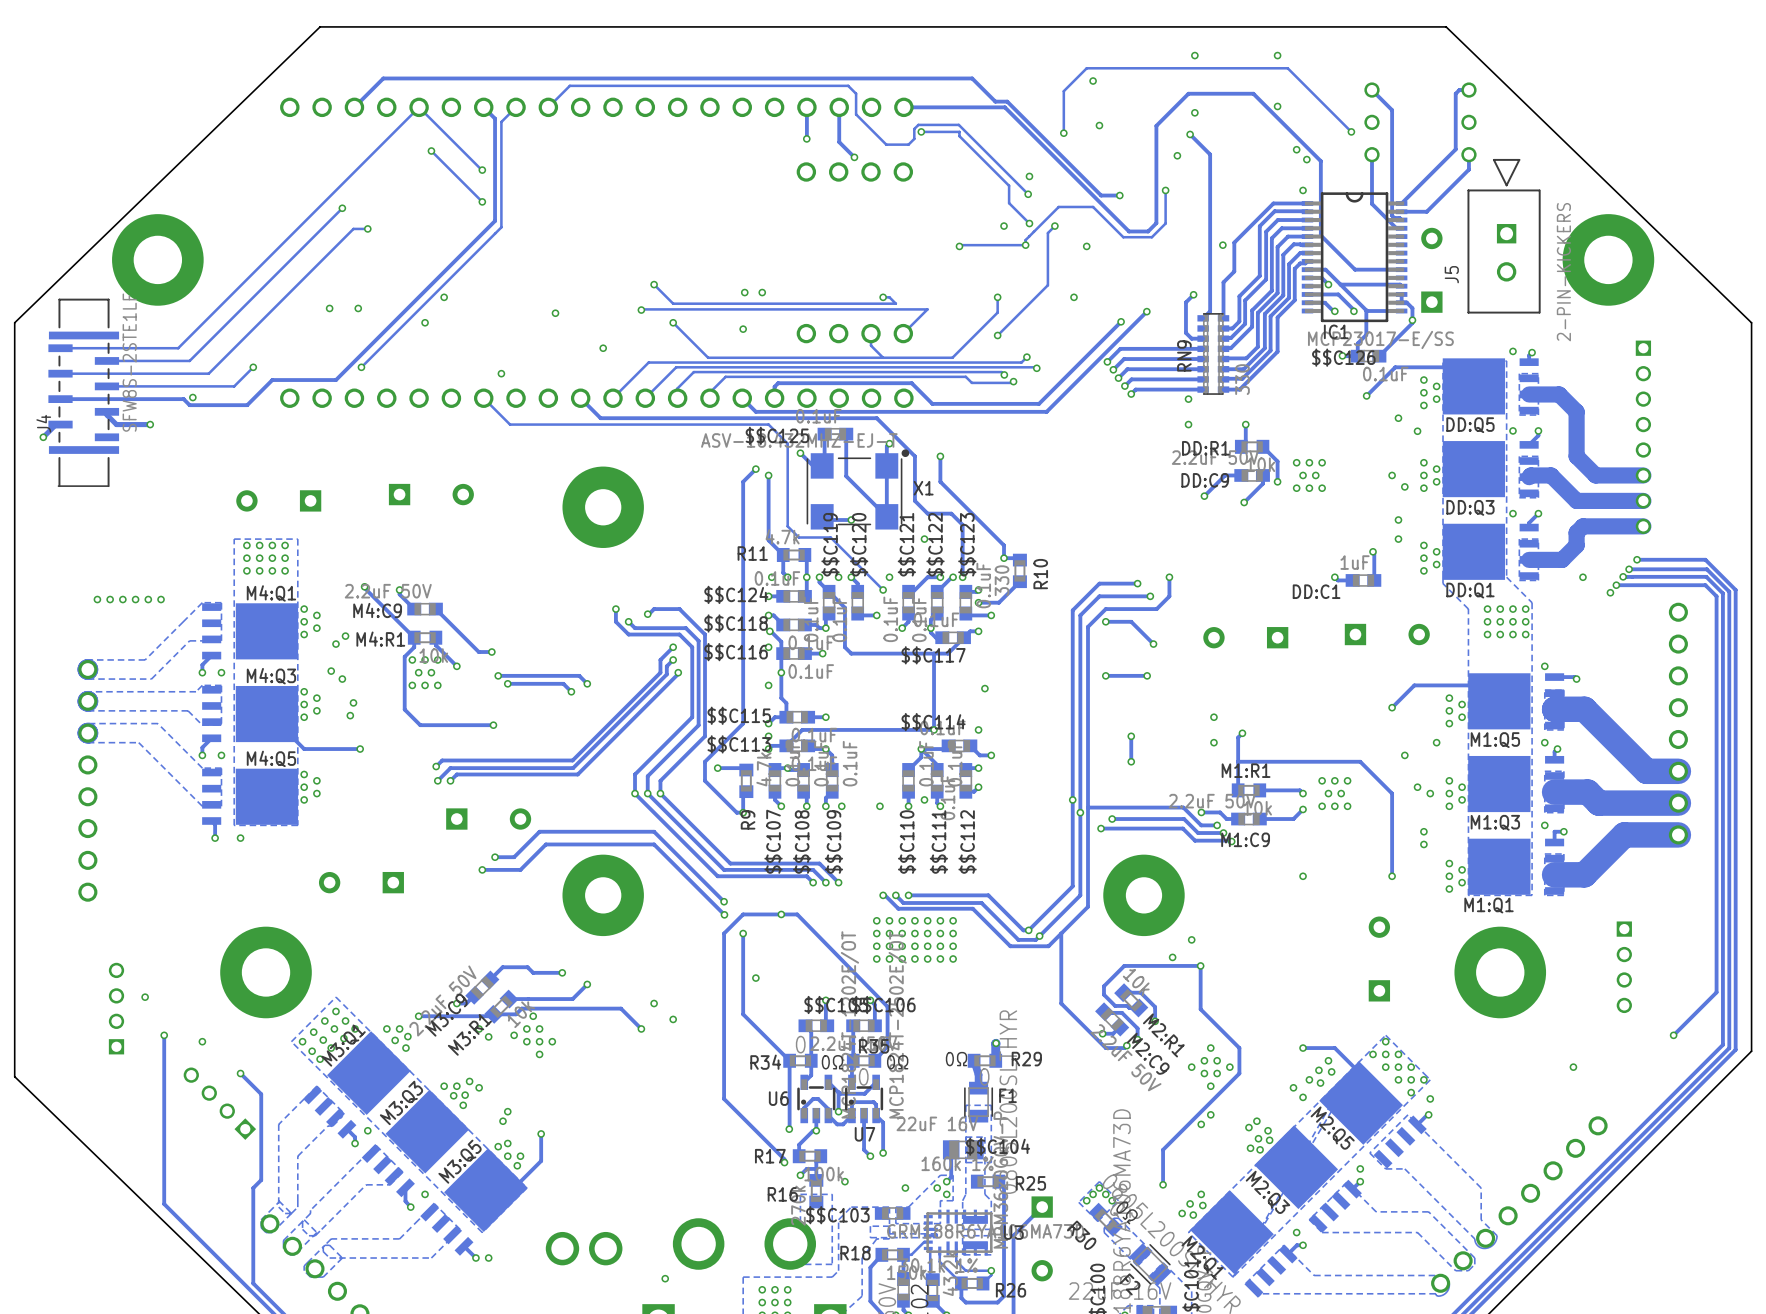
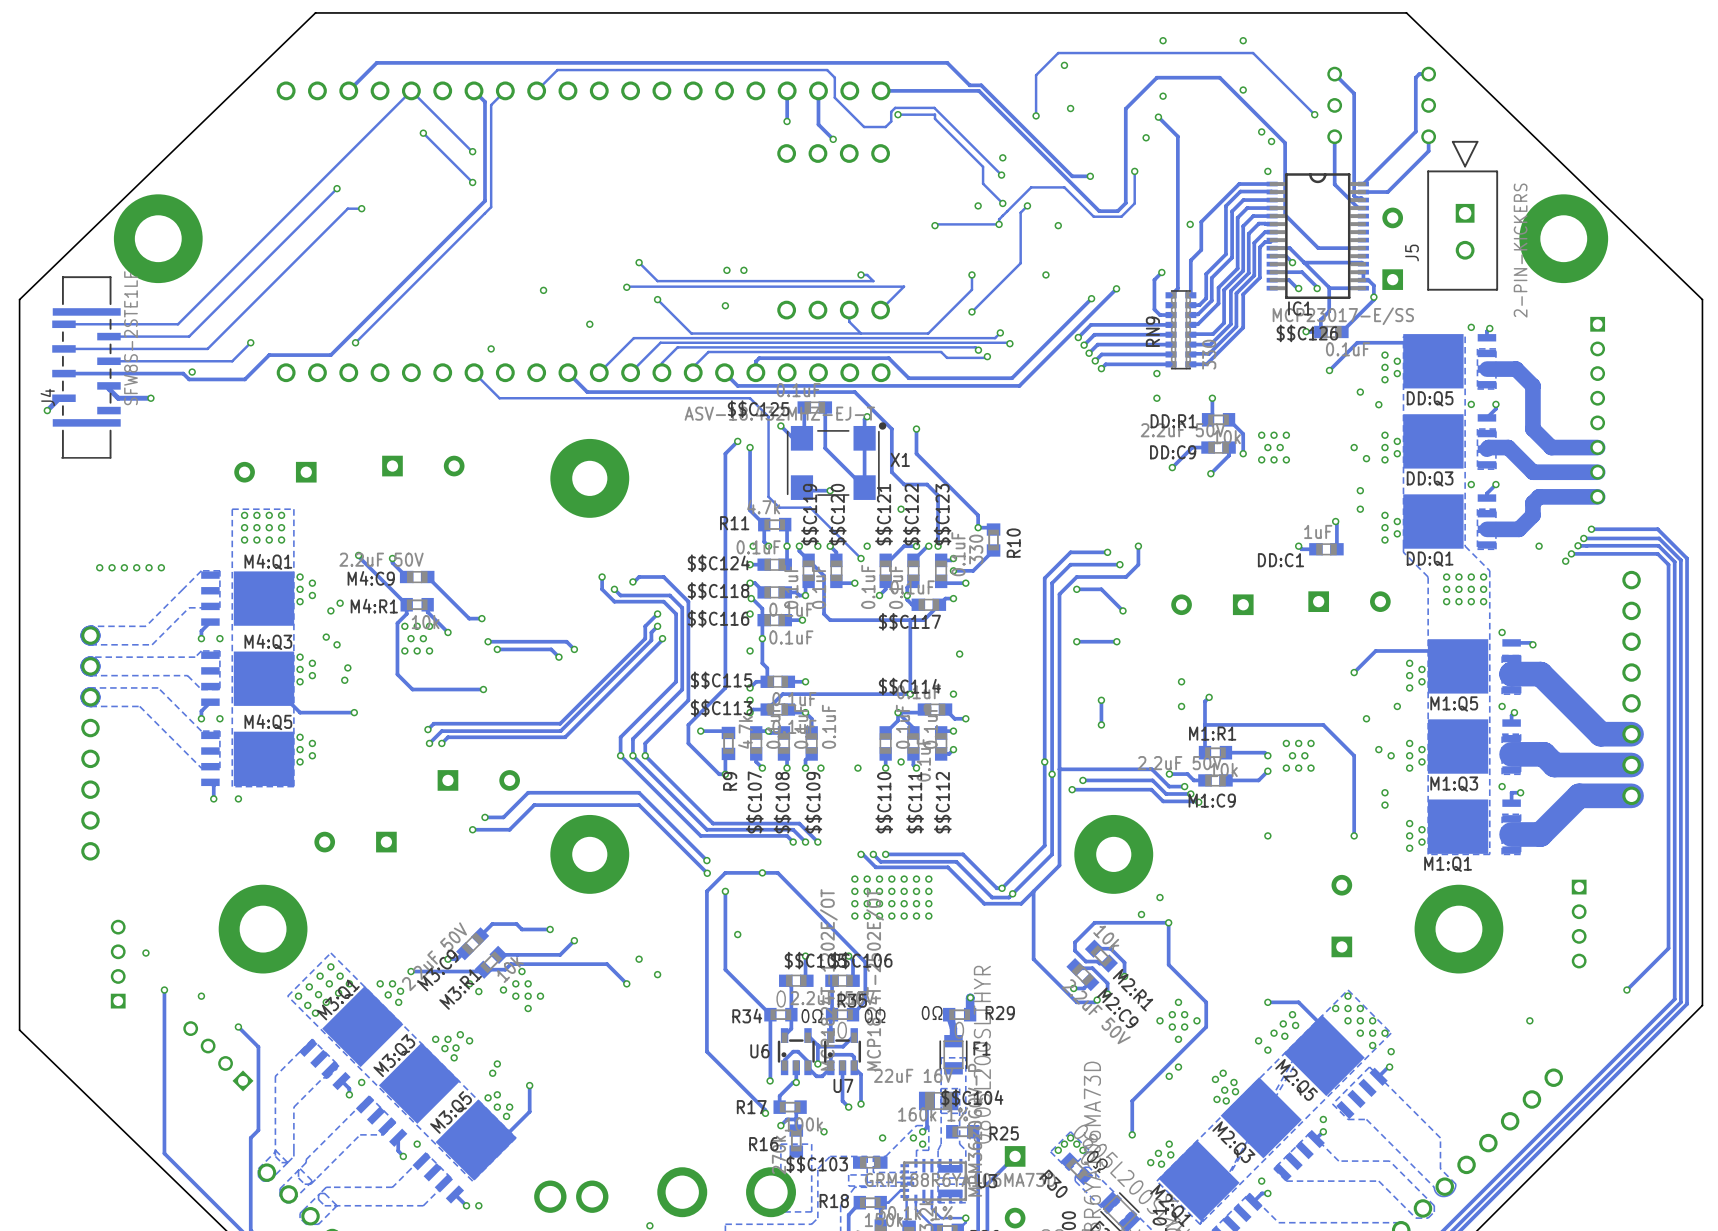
via: (444, 297) -> none
via: (329, 308) -> none
via: (358, 308) -> none
via: (425, 322) -> none

